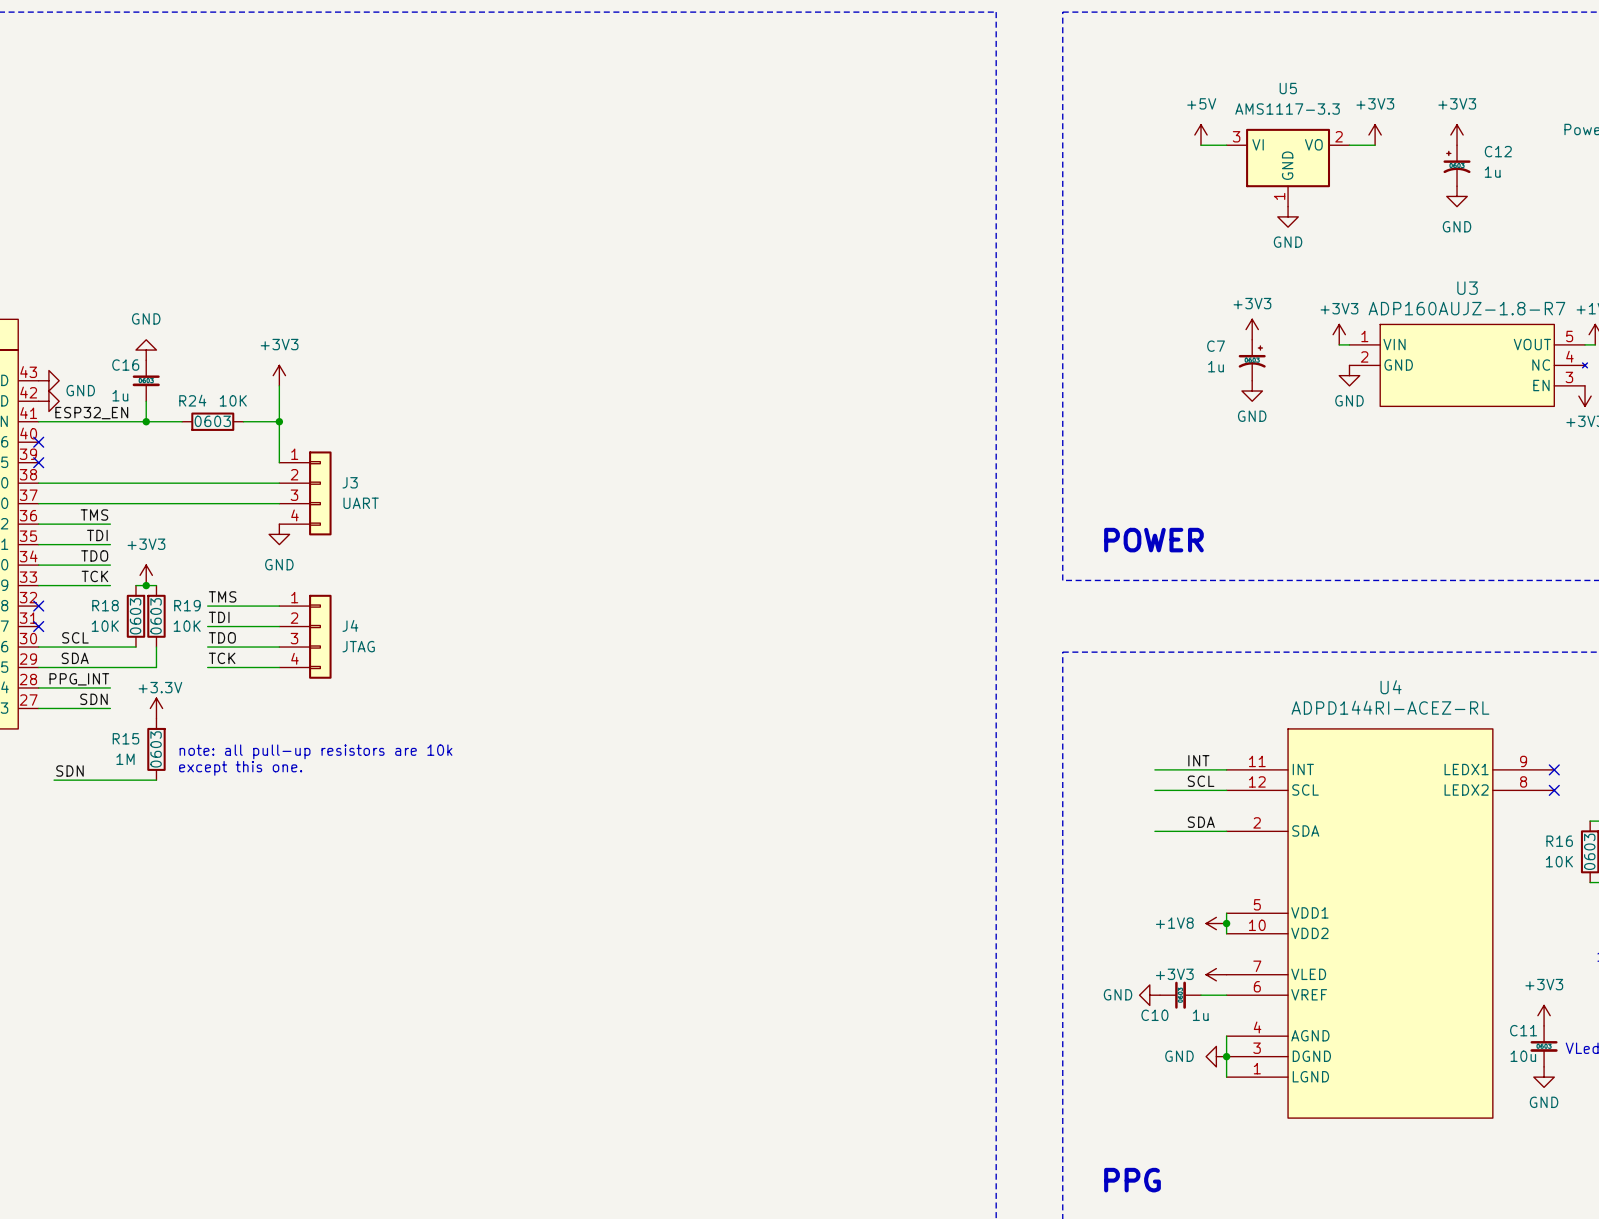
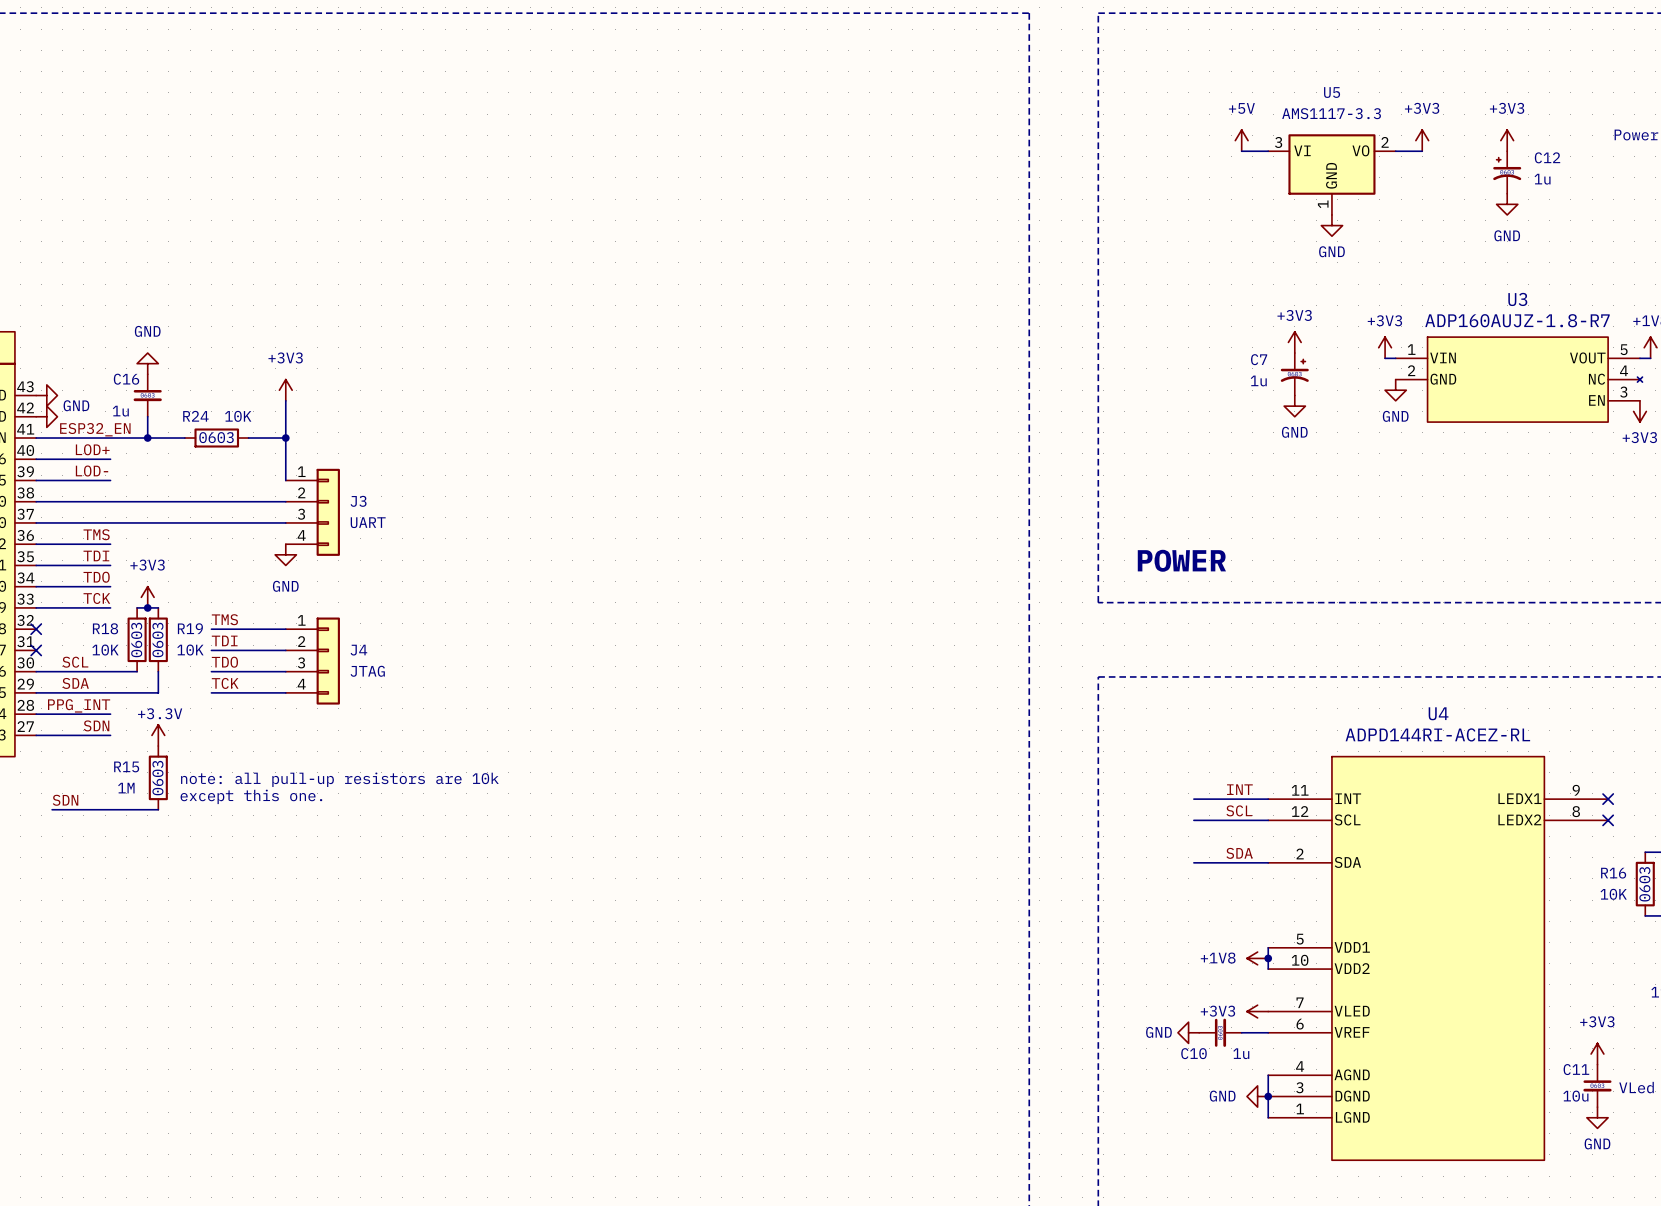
label: none -> LOD+ (92, 449)
wire: none -> (36, 459) (110, 459)
no-connect mark: (38, 442) -> none
label: none -> LOD- (92, 471)
wire: none -> (36, 480) (110, 480)
no-connect mark: (38, 462) -> none

